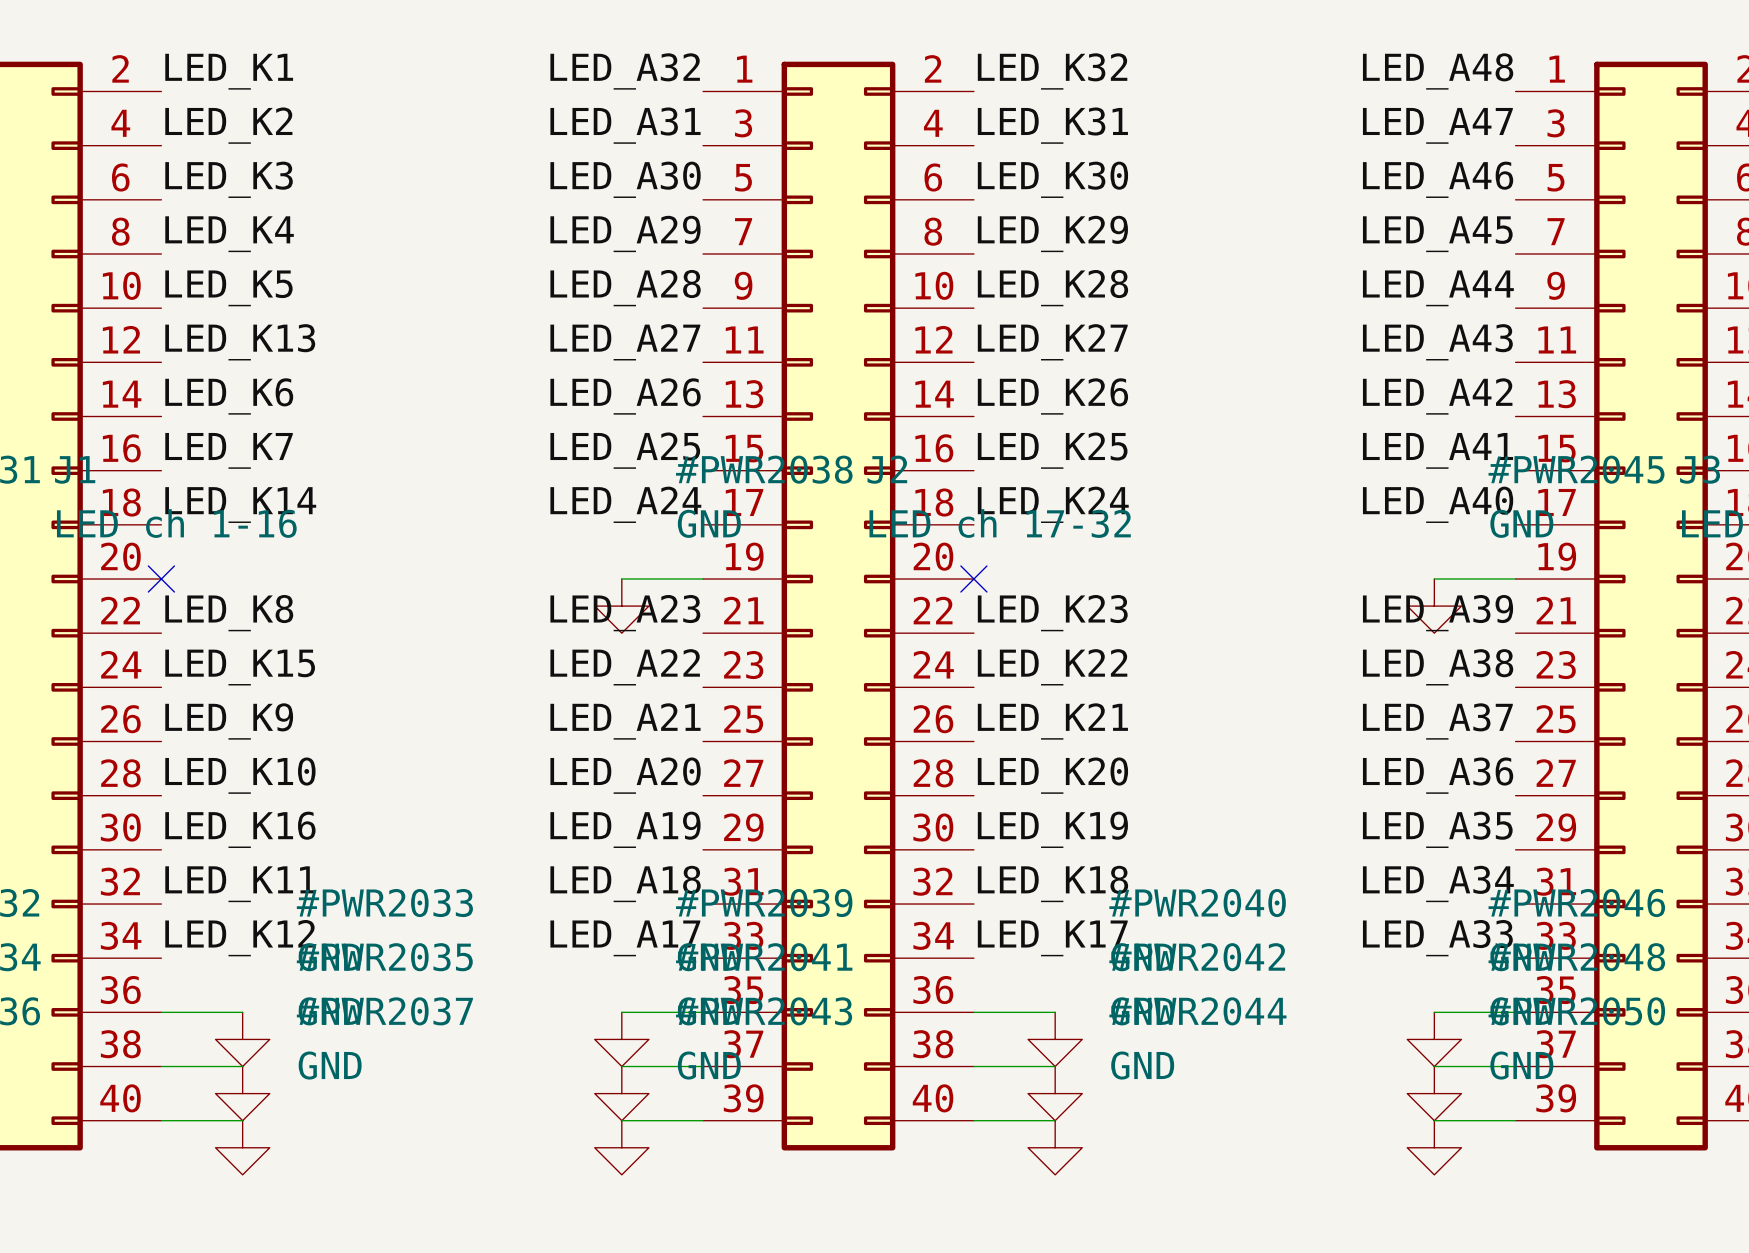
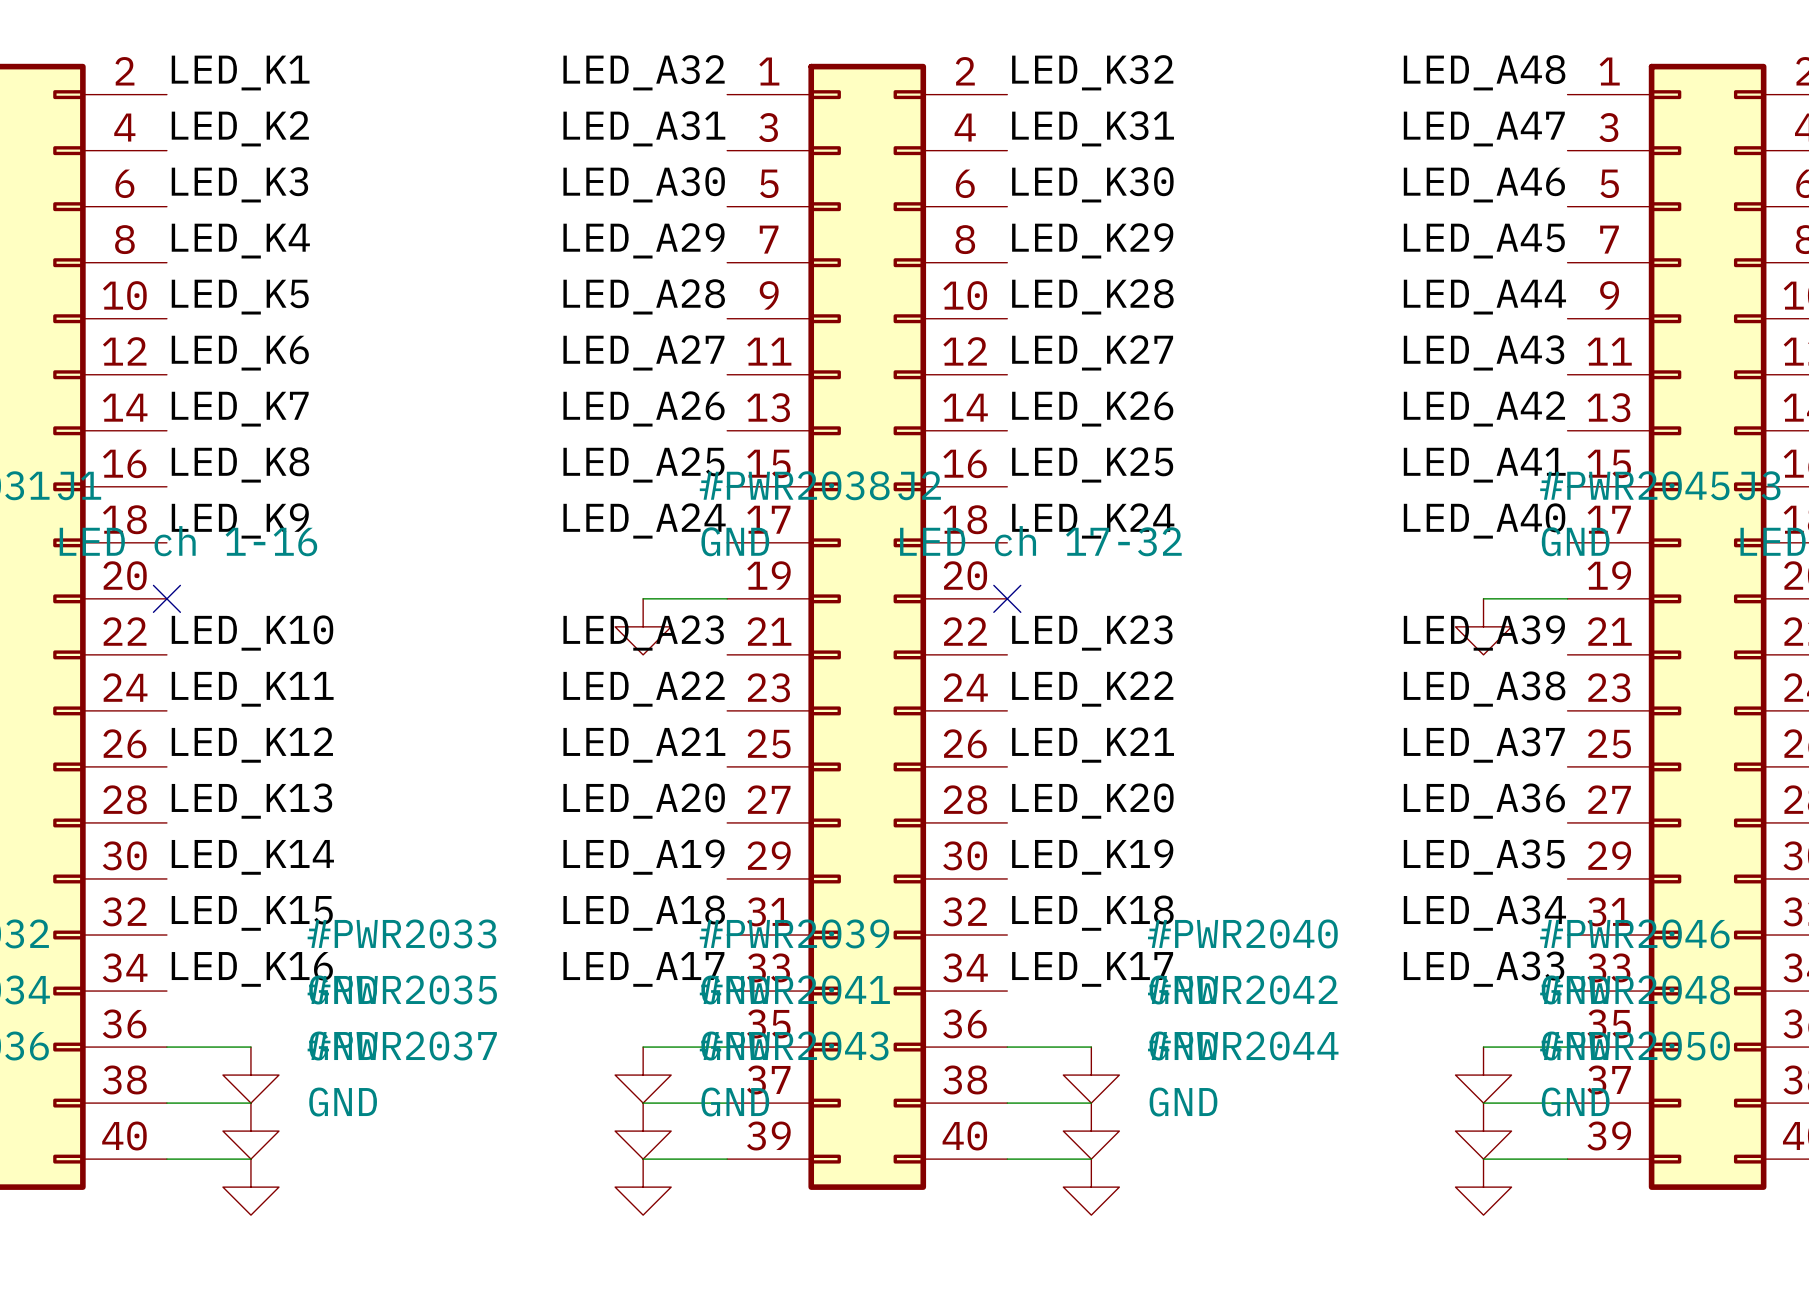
label: LED_K13 (240, 342) -> LED_K6 (240, 353)
label: LED_K6 (229, 396) -> LED_K7 (240, 409)
label: LED_K7 (229, 450) -> LED_K8 (240, 464)
label: LED_K14 (240, 505) -> LED_K9 (240, 520)
label: LED_K8 (229, 613) -> LED_K10 (252, 633)
label: LED_K15 (240, 667) -> LED_K11 (252, 689)
label: LED_K9 (229, 721) -> LED_K12 (252, 745)
label: LED_K10 (240, 775) -> LED_K13 (251, 801)
label: LED_K16 (240, 829) -> LED_K14 (252, 857)
label: LED_K11 (240, 884) -> LED_K15 (252, 913)
label: LED_K12 (240, 938) -> LED_K16 (252, 969)

